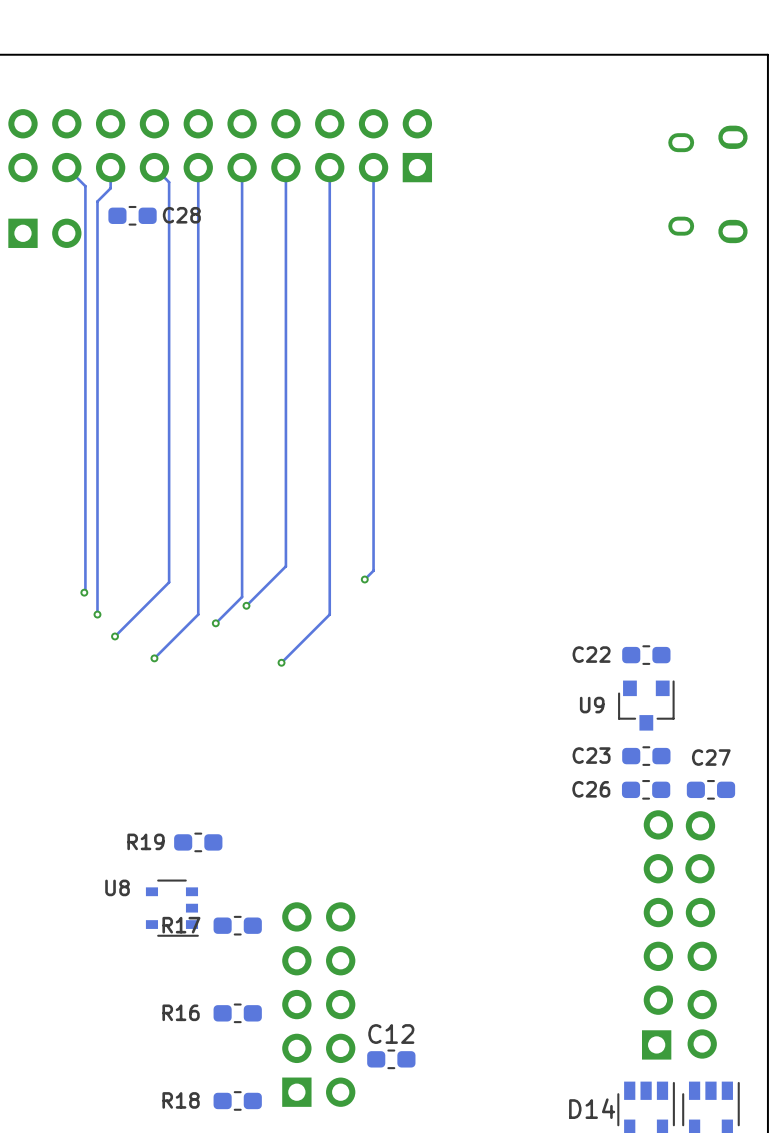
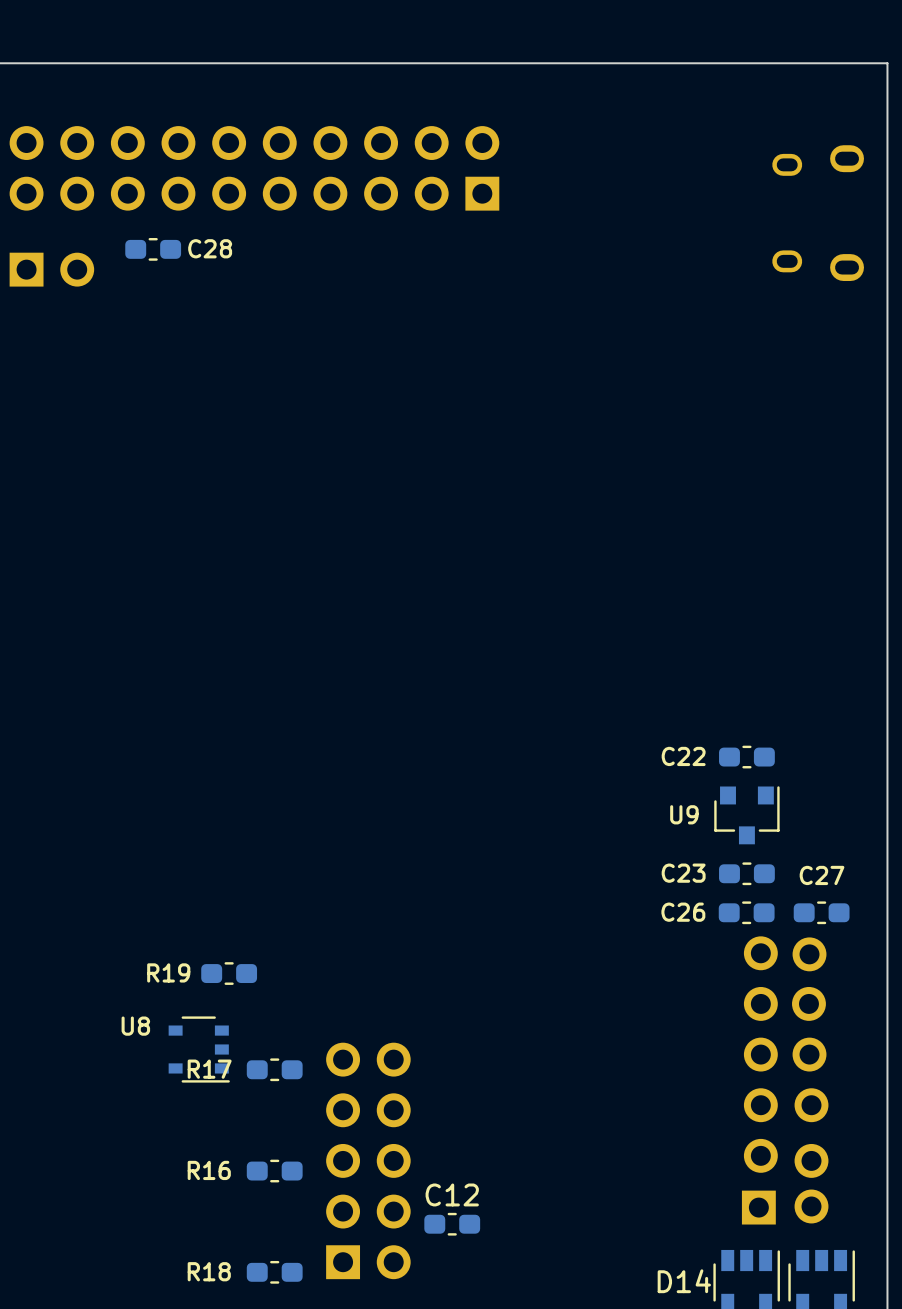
track: (66, 167) (85, 186) (84, 592) -> none
track: (110, 167) (110, 188) (97, 201) (97, 614) -> none
track: (154, 167) (169, 182) (169, 582) (115, 636) -> none
track: (198, 167) (198, 614) (154, 658) -> none
track: (242, 167) (242, 597) (215, 623) -> none
track: (285, 167) (285, 566) (246, 605) -> none
track: (329, 167) (329, 614) (281, 662) -> none
track: (373, 167) (373, 570) (364, 579) -> none
via: (364, 579) -> none
via: (84, 592) -> none
via: (246, 605) -> none
via: (97, 614) -> none
via: (215, 623) -> none
via: (115, 636) -> none
via: (154, 658) -> none
via: (281, 662) -> none

